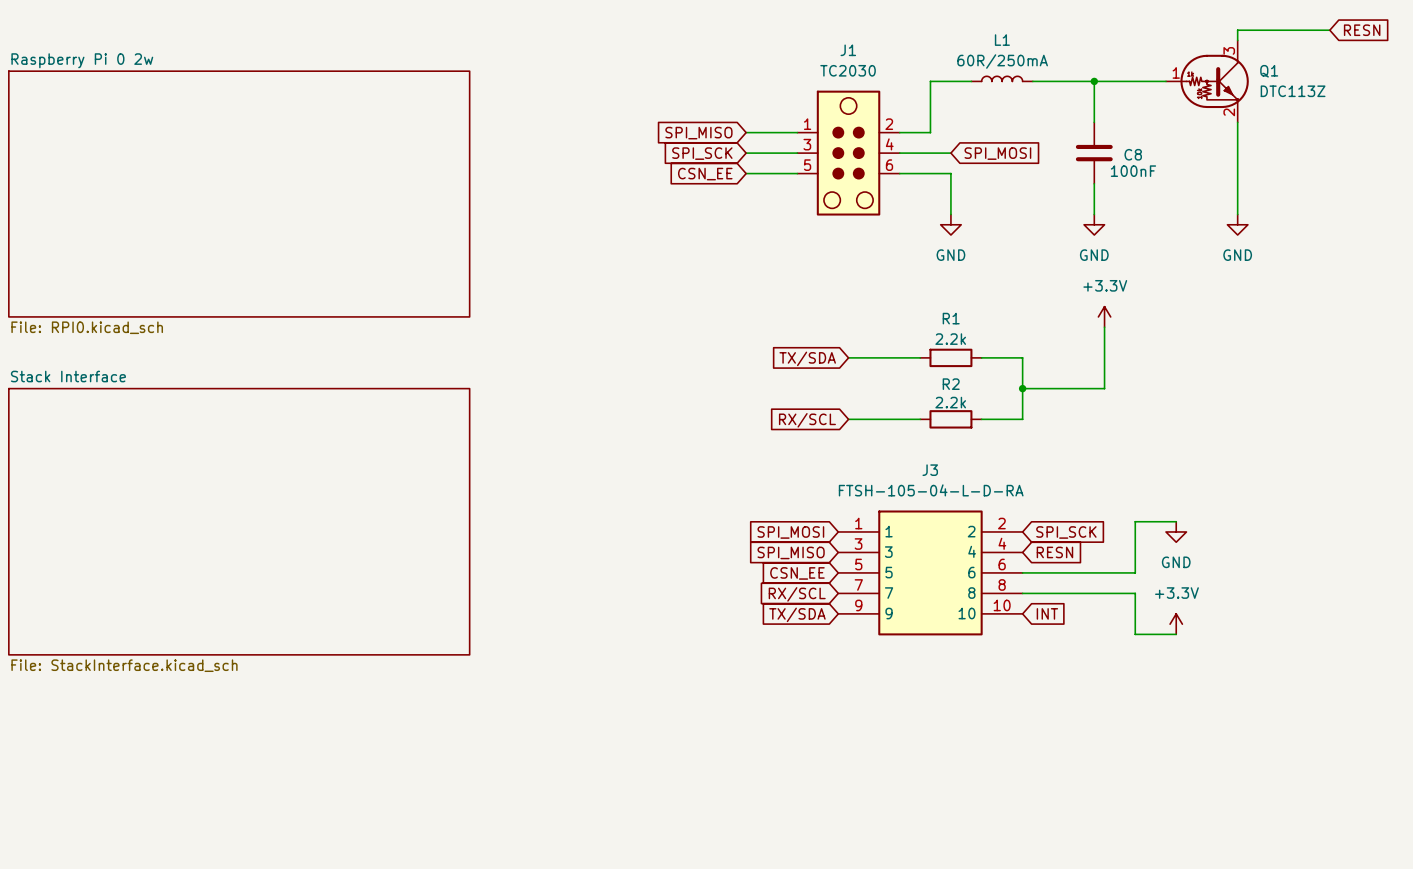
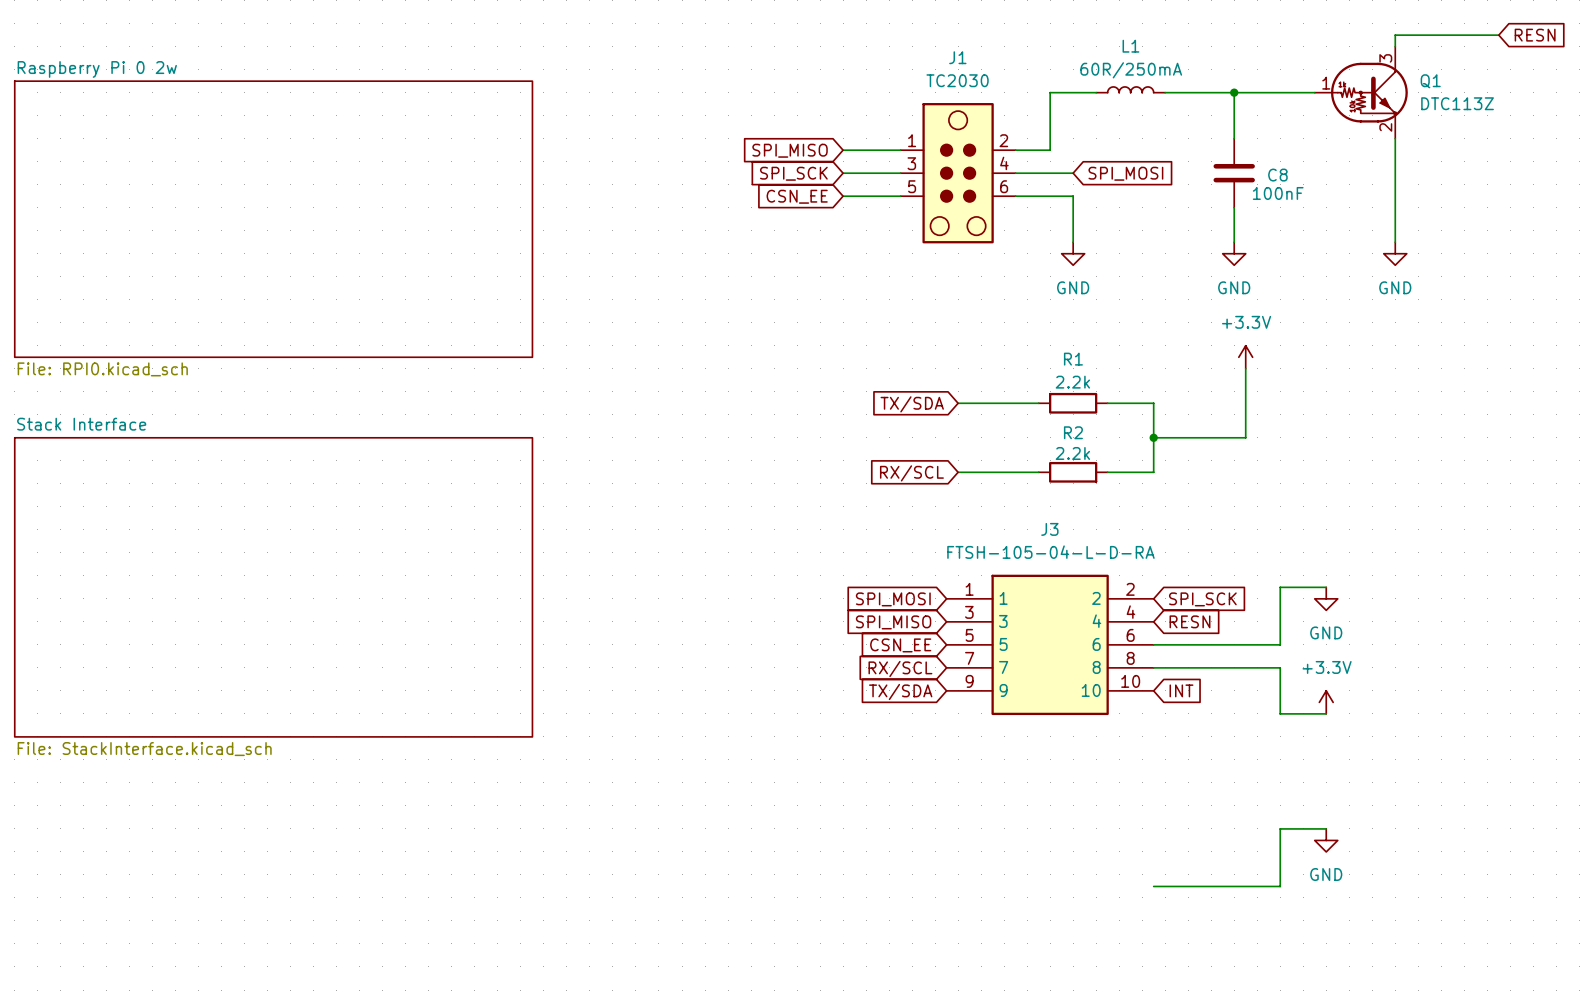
wire: none -> (1326, 828) (1280, 828) (1280, 886) (1153, 886)
power symbol: none -> GND (1326, 840)

